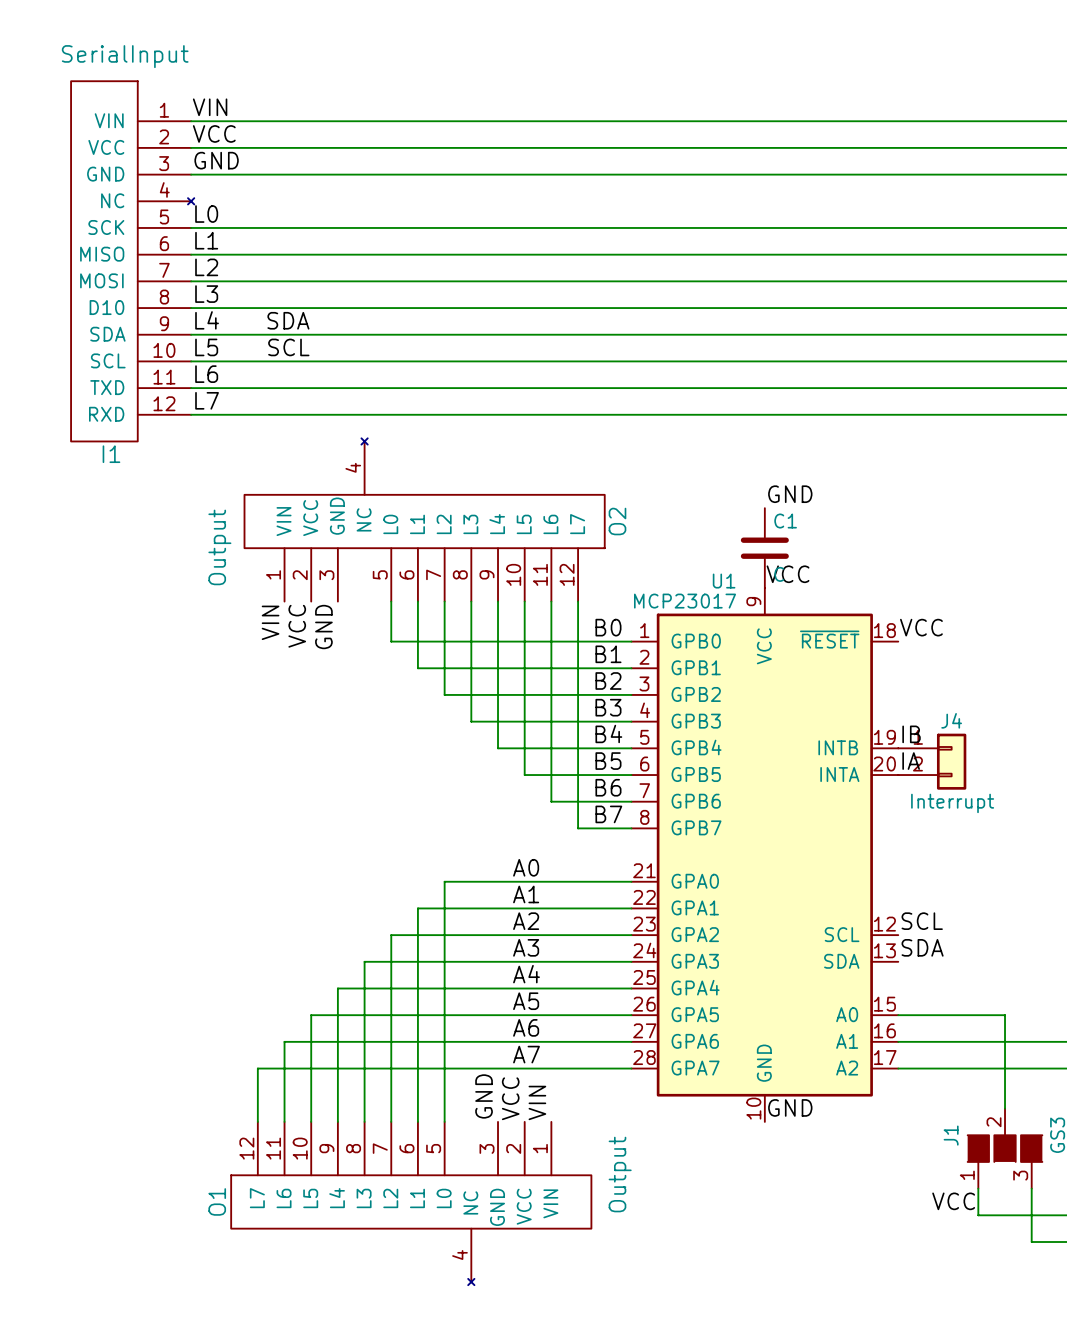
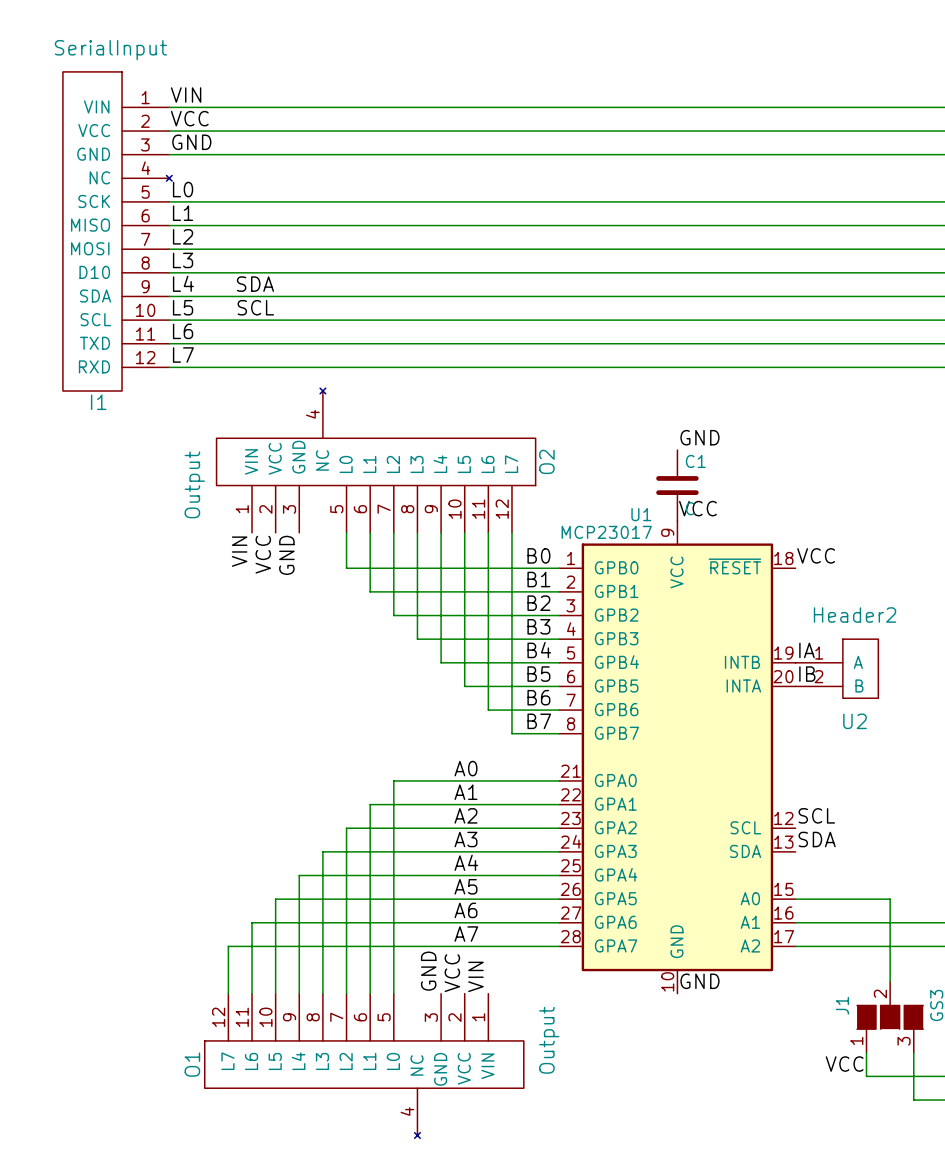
label: IB (911, 734) -> IA (807, 650)
U2: none -> Header2 (836, 668)
label: IA (911, 761) -> IB (807, 674)
J4: Interrupt (932, 761) -> none

